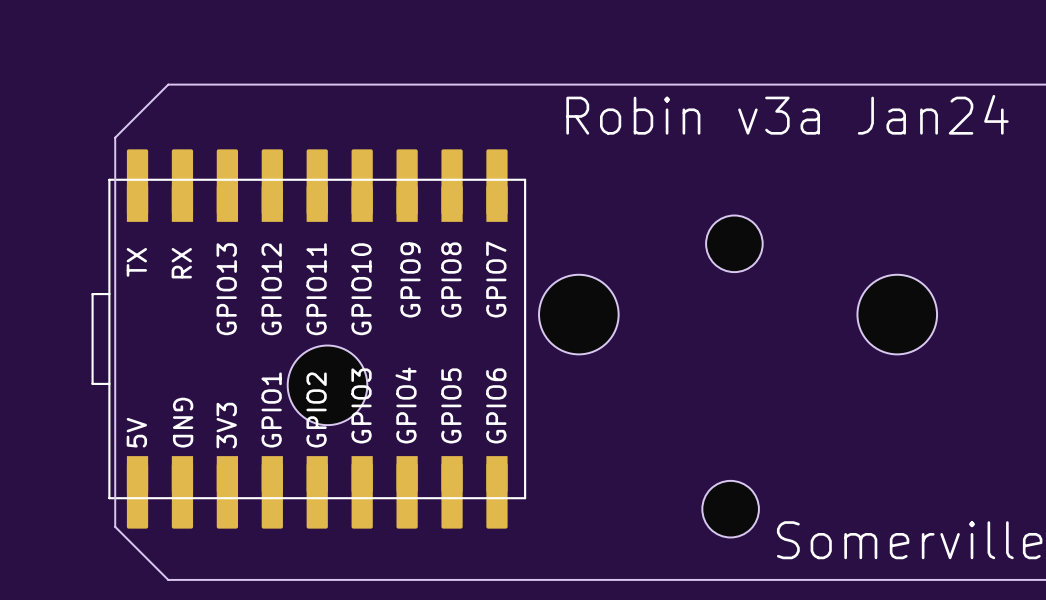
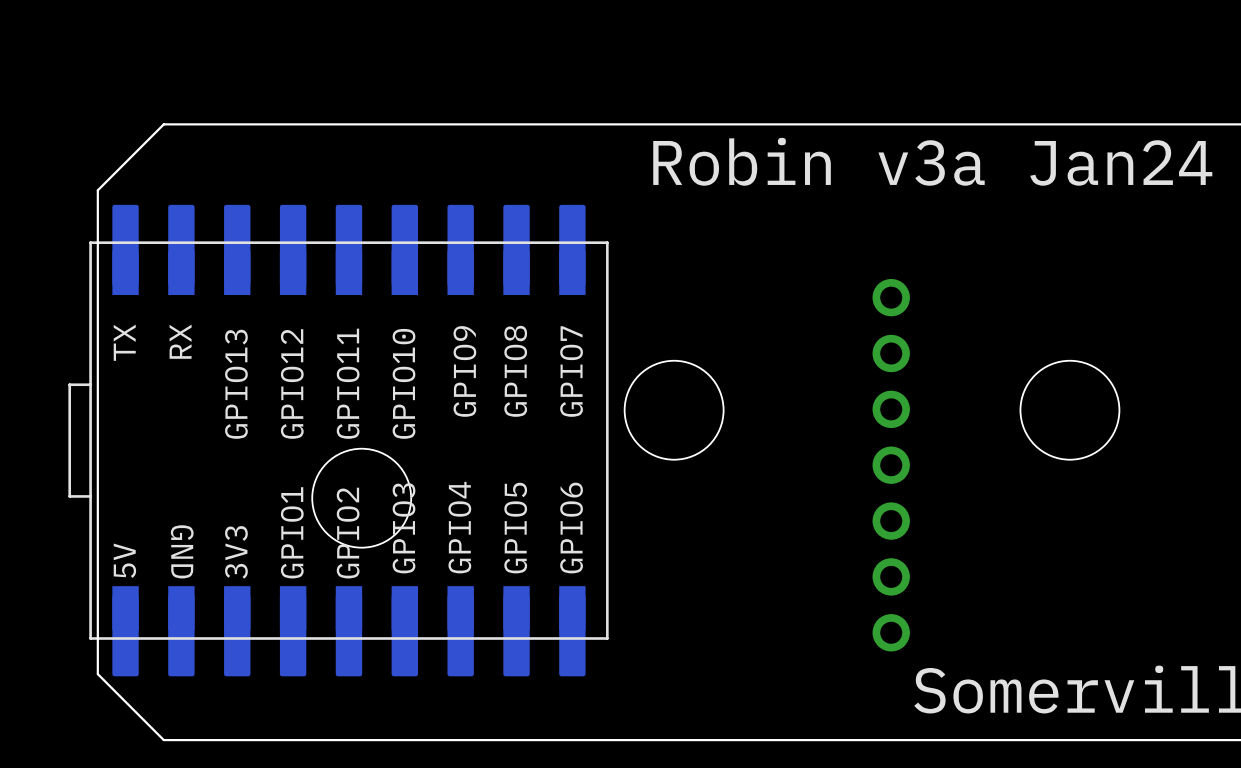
part: (734, 243) -> none
part: none -> (891, 465)
part: (730, 509) -> none

